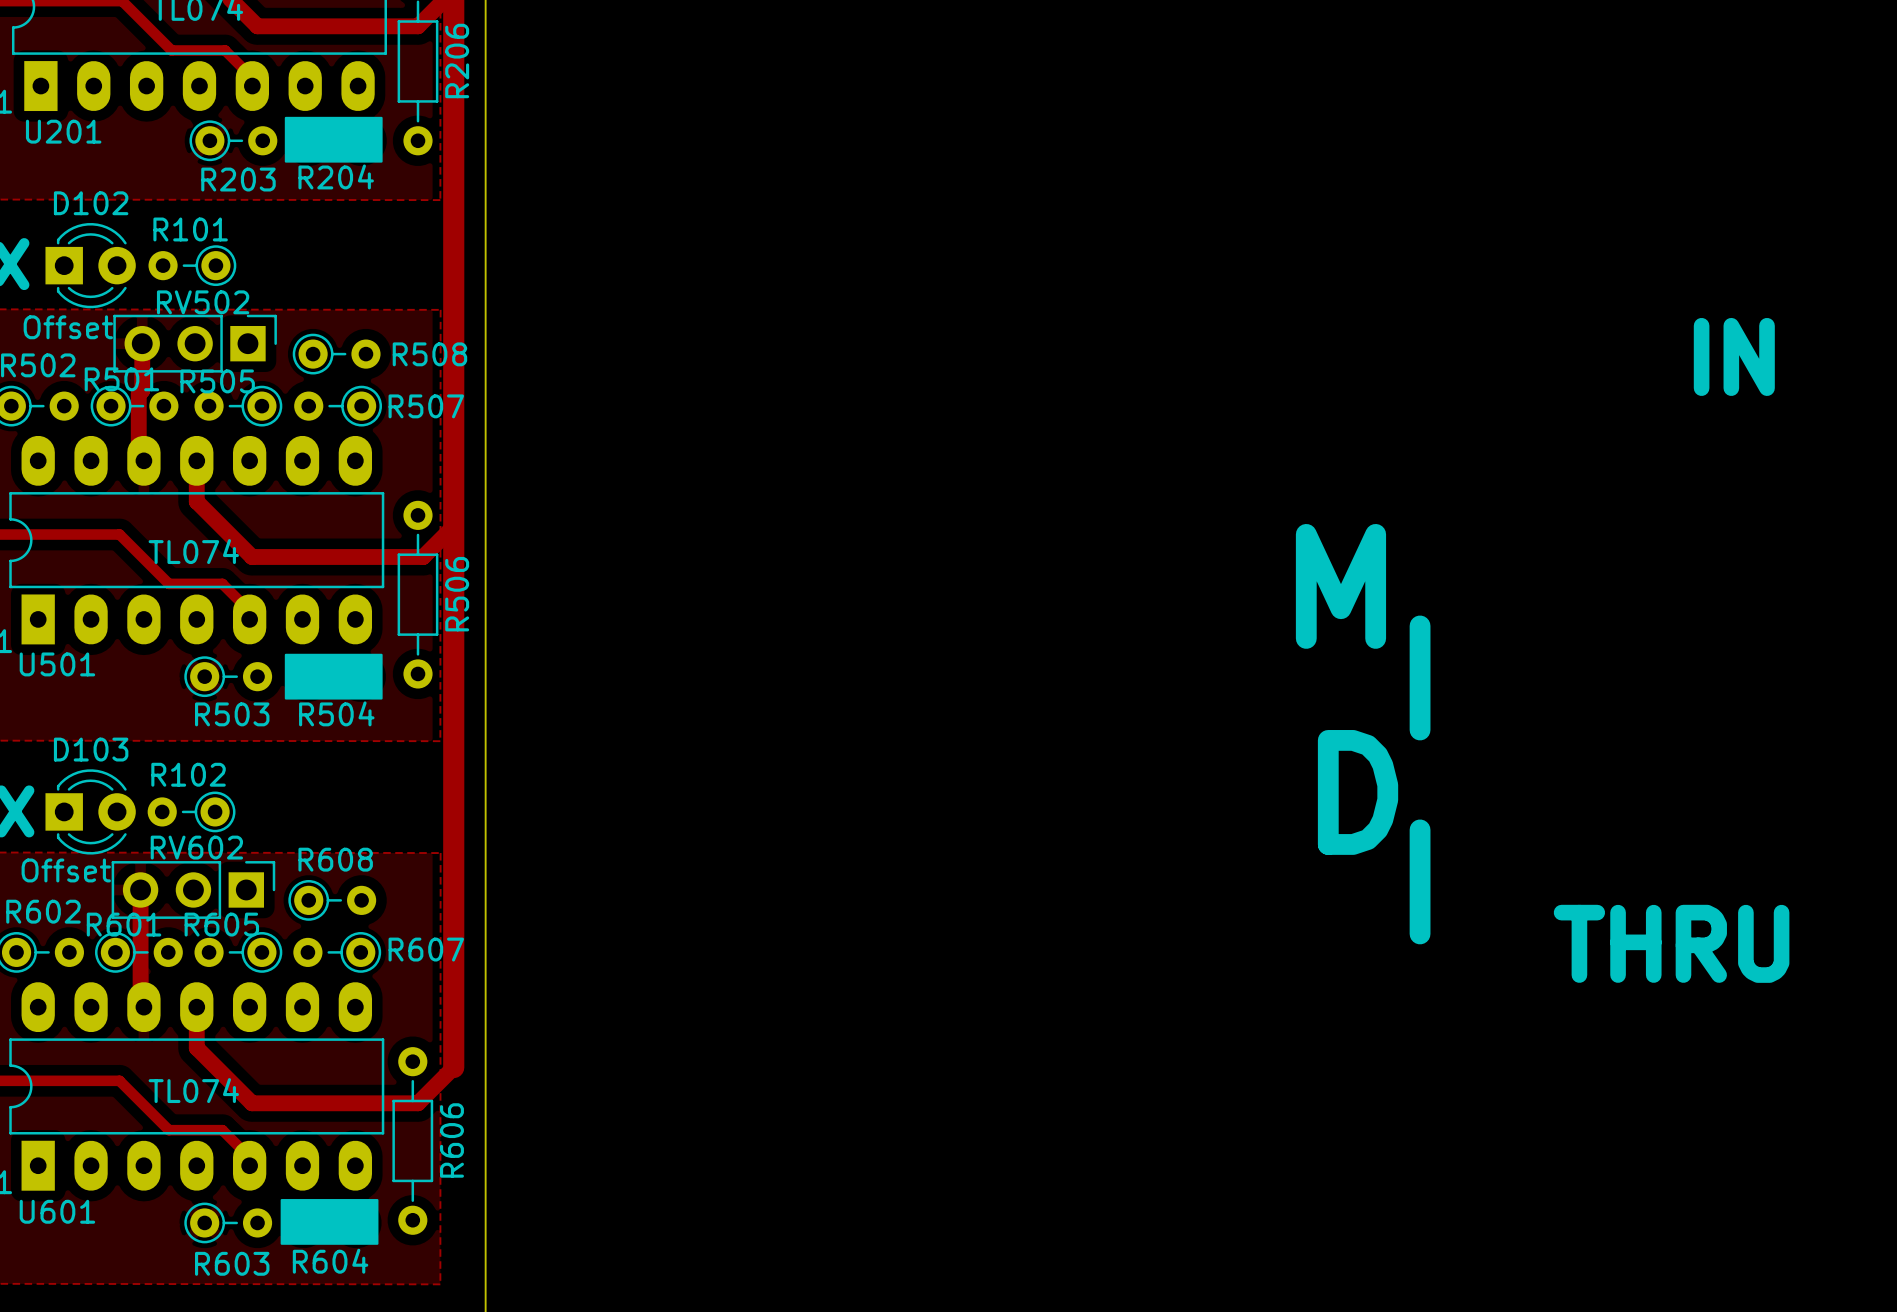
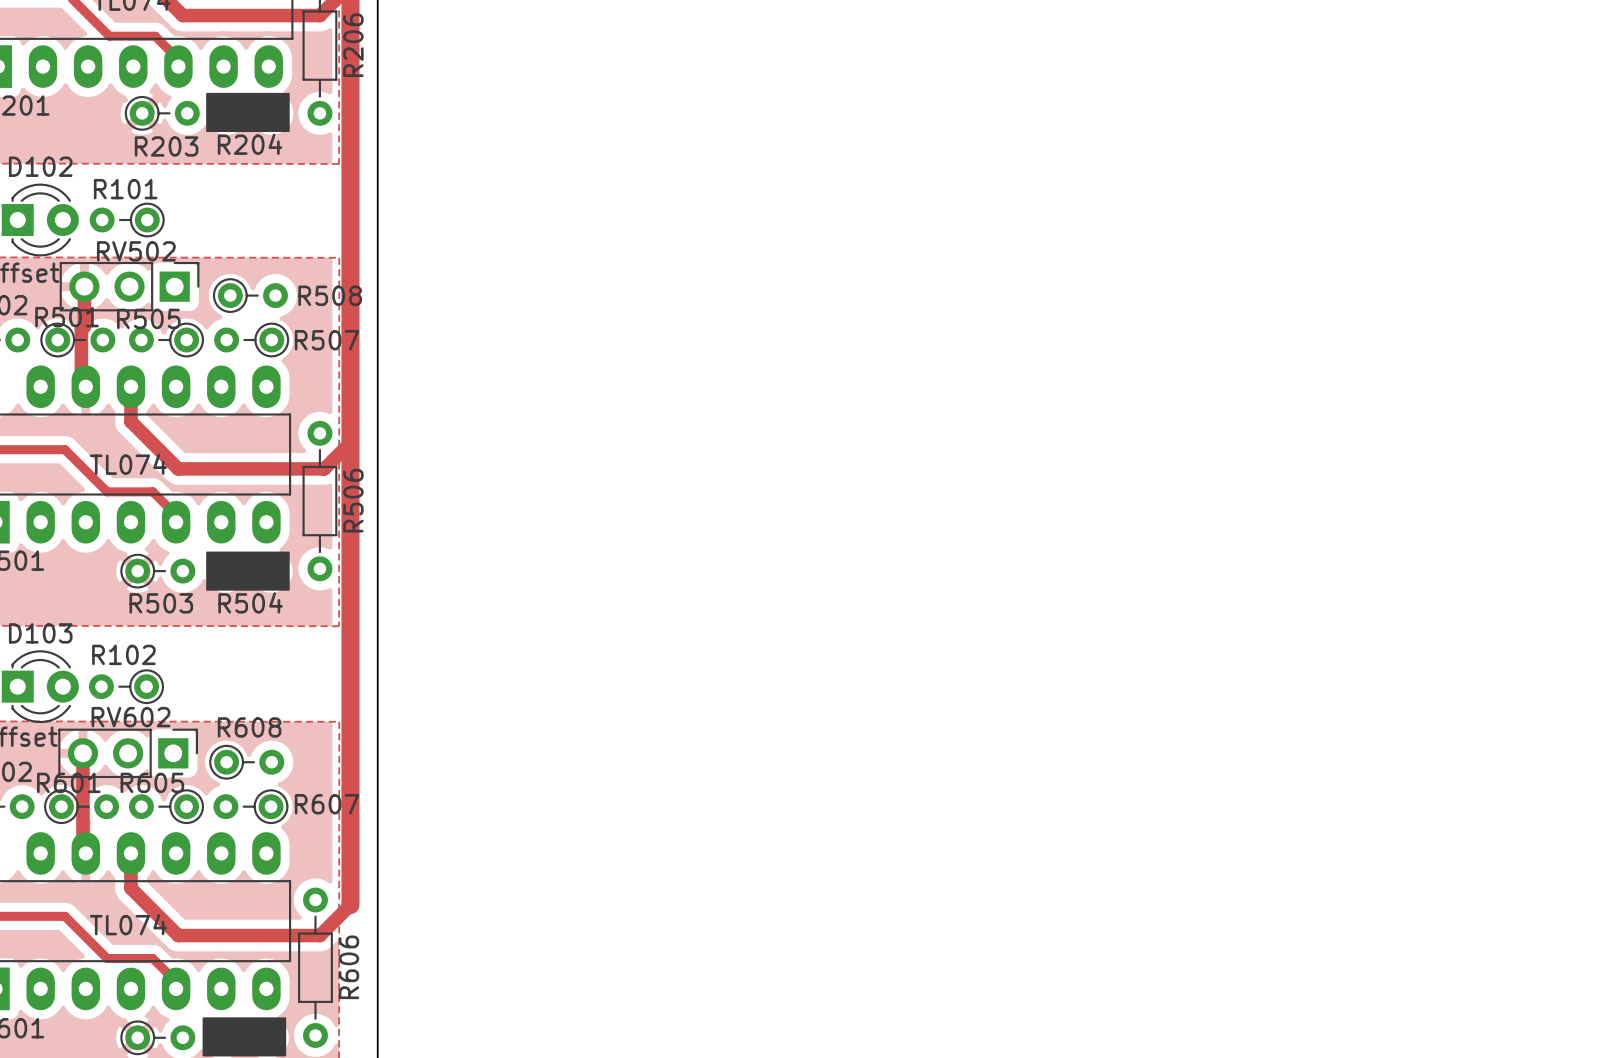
text: IN (1734, 356) -> none
text: M (1340, 586) -> none
text: I (1420, 677) -> none
text: D (1358, 792) -> none
text: I (1420, 881) -> none
text: THRU (1671, 943) -> none

